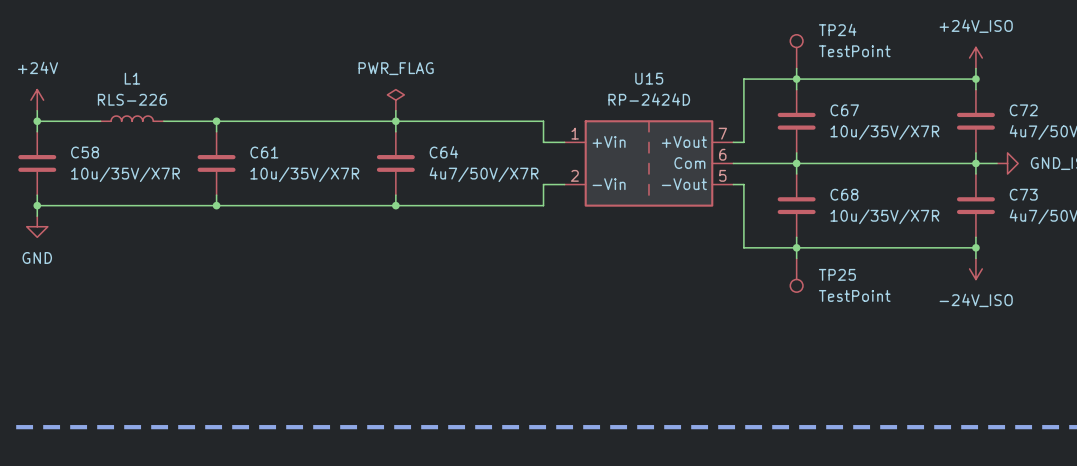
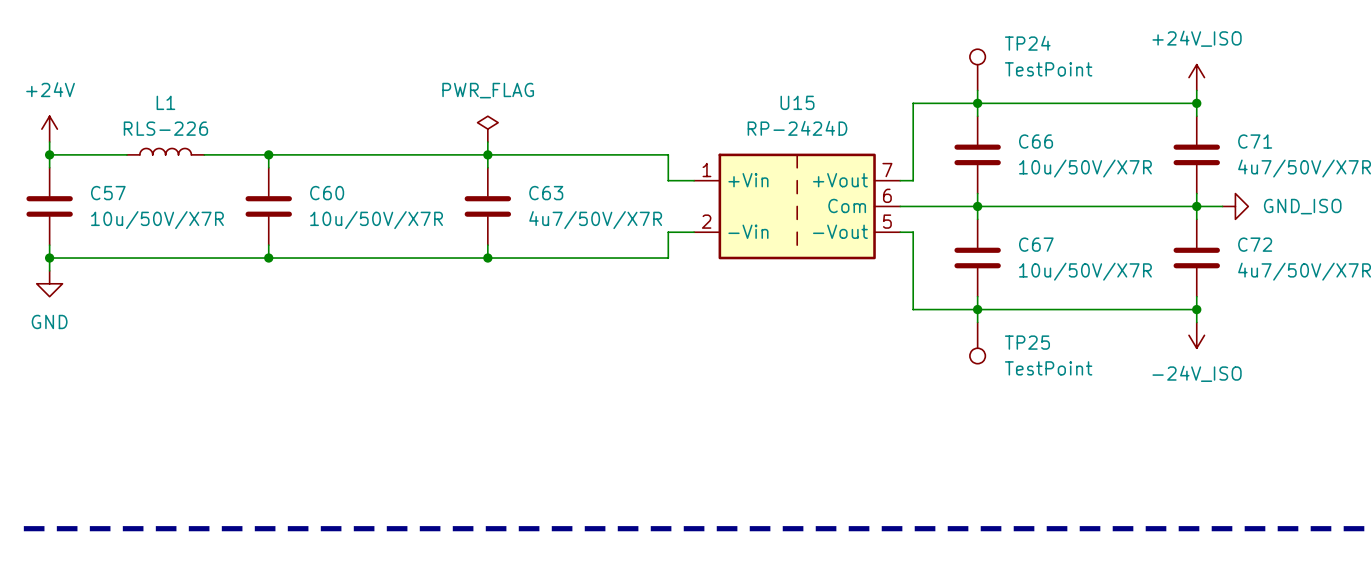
C67 name: C67 (844, 110) -> C66 (1036, 141)
C72 name: C72 (1023, 110) -> C71 (1255, 141)
C67 value: 10u/35V/X7R (884, 132) -> 10u/50V/X7R (1085, 168)
C58 name: C58 (85, 152) -> C57 (108, 193)
C61 name: C61 (264, 152) -> C60 (327, 193)
C64 name: C64 (443, 152) -> C63 (546, 193)
C58 value: 10u/35V/X7R (125, 174) -> 10u/50V/X7R (157, 220)
C61 value: 10u/35V/X7R (304, 174) -> 10u/50V/X7R (376, 220)
C68 name: C68 (844, 194) -> C67 (1036, 244)
C73 name: C73 (1023, 194) -> C72 (1255, 244)
C68 value: 10u/35V/X7R (884, 216) -> 10u/50V/X7R (1085, 271)

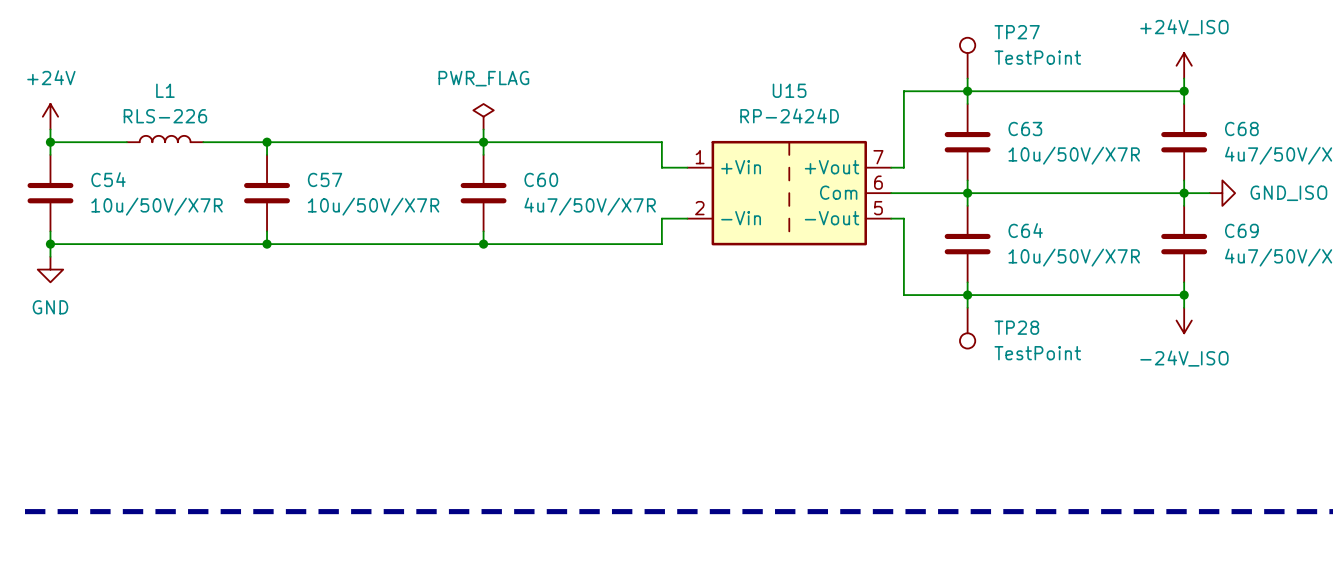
TP24 name: TP24 (1027, 43) -> TP27 (1017, 32)
C66 name: C66 (1036, 141) -> C63 (1025, 128)
C71 name: C71 (1255, 141) -> C68 (1241, 128)
C57 name: C57 (108, 193) -> C54 (108, 179)
C60 name: C60 (327, 193) -> C57 (325, 179)
C63 name: C63 (546, 193) -> C60 (541, 179)
C67 name: C67 (1036, 244) -> C64 (1025, 230)
C72 name: C72 (1255, 244) -> C69 (1241, 230)
TP25 name: TP25 (1027, 342) -> TP28 (1016, 327)

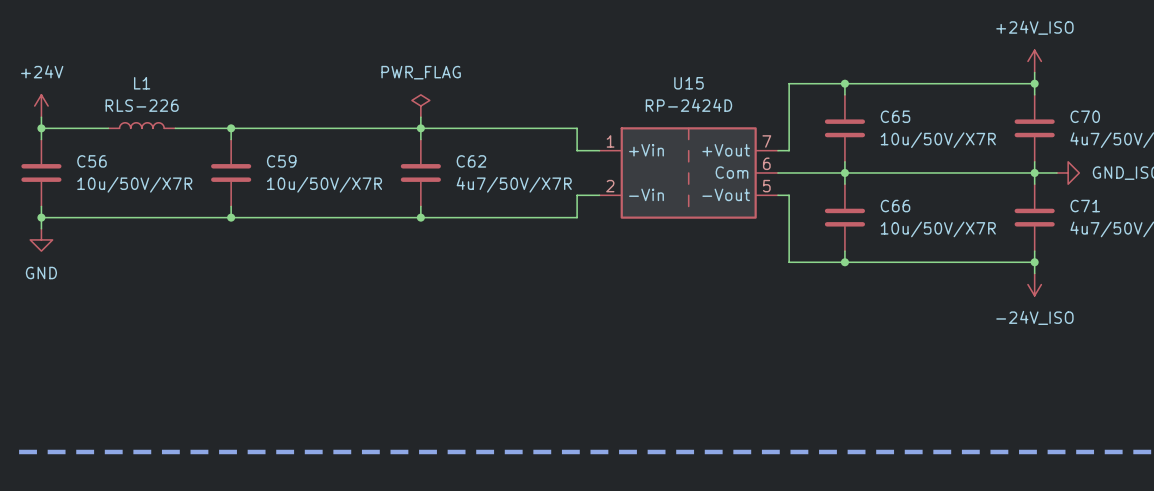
TP27: TestPoint (967, 58) -> none
wire: (967, 78) (967, 91) -> none
C63 name: C63 (1025, 128) -> C65 (895, 116)
C68 name: C68 (1241, 128) -> C70 (1085, 116)
C54 name: C54 (108, 179) -> C56 (91, 161)
C57 name: C57 (325, 179) -> C59 (281, 161)
C60 name: C60 (541, 179) -> C62 (471, 161)
C64 name: C64 (1025, 230) -> C66 (895, 206)
C69 name: C69 (1241, 230) -> C71 (1085, 206)
wire: (967, 295) (967, 307) -> none
TP28: TestPoint (967, 328) -> none

